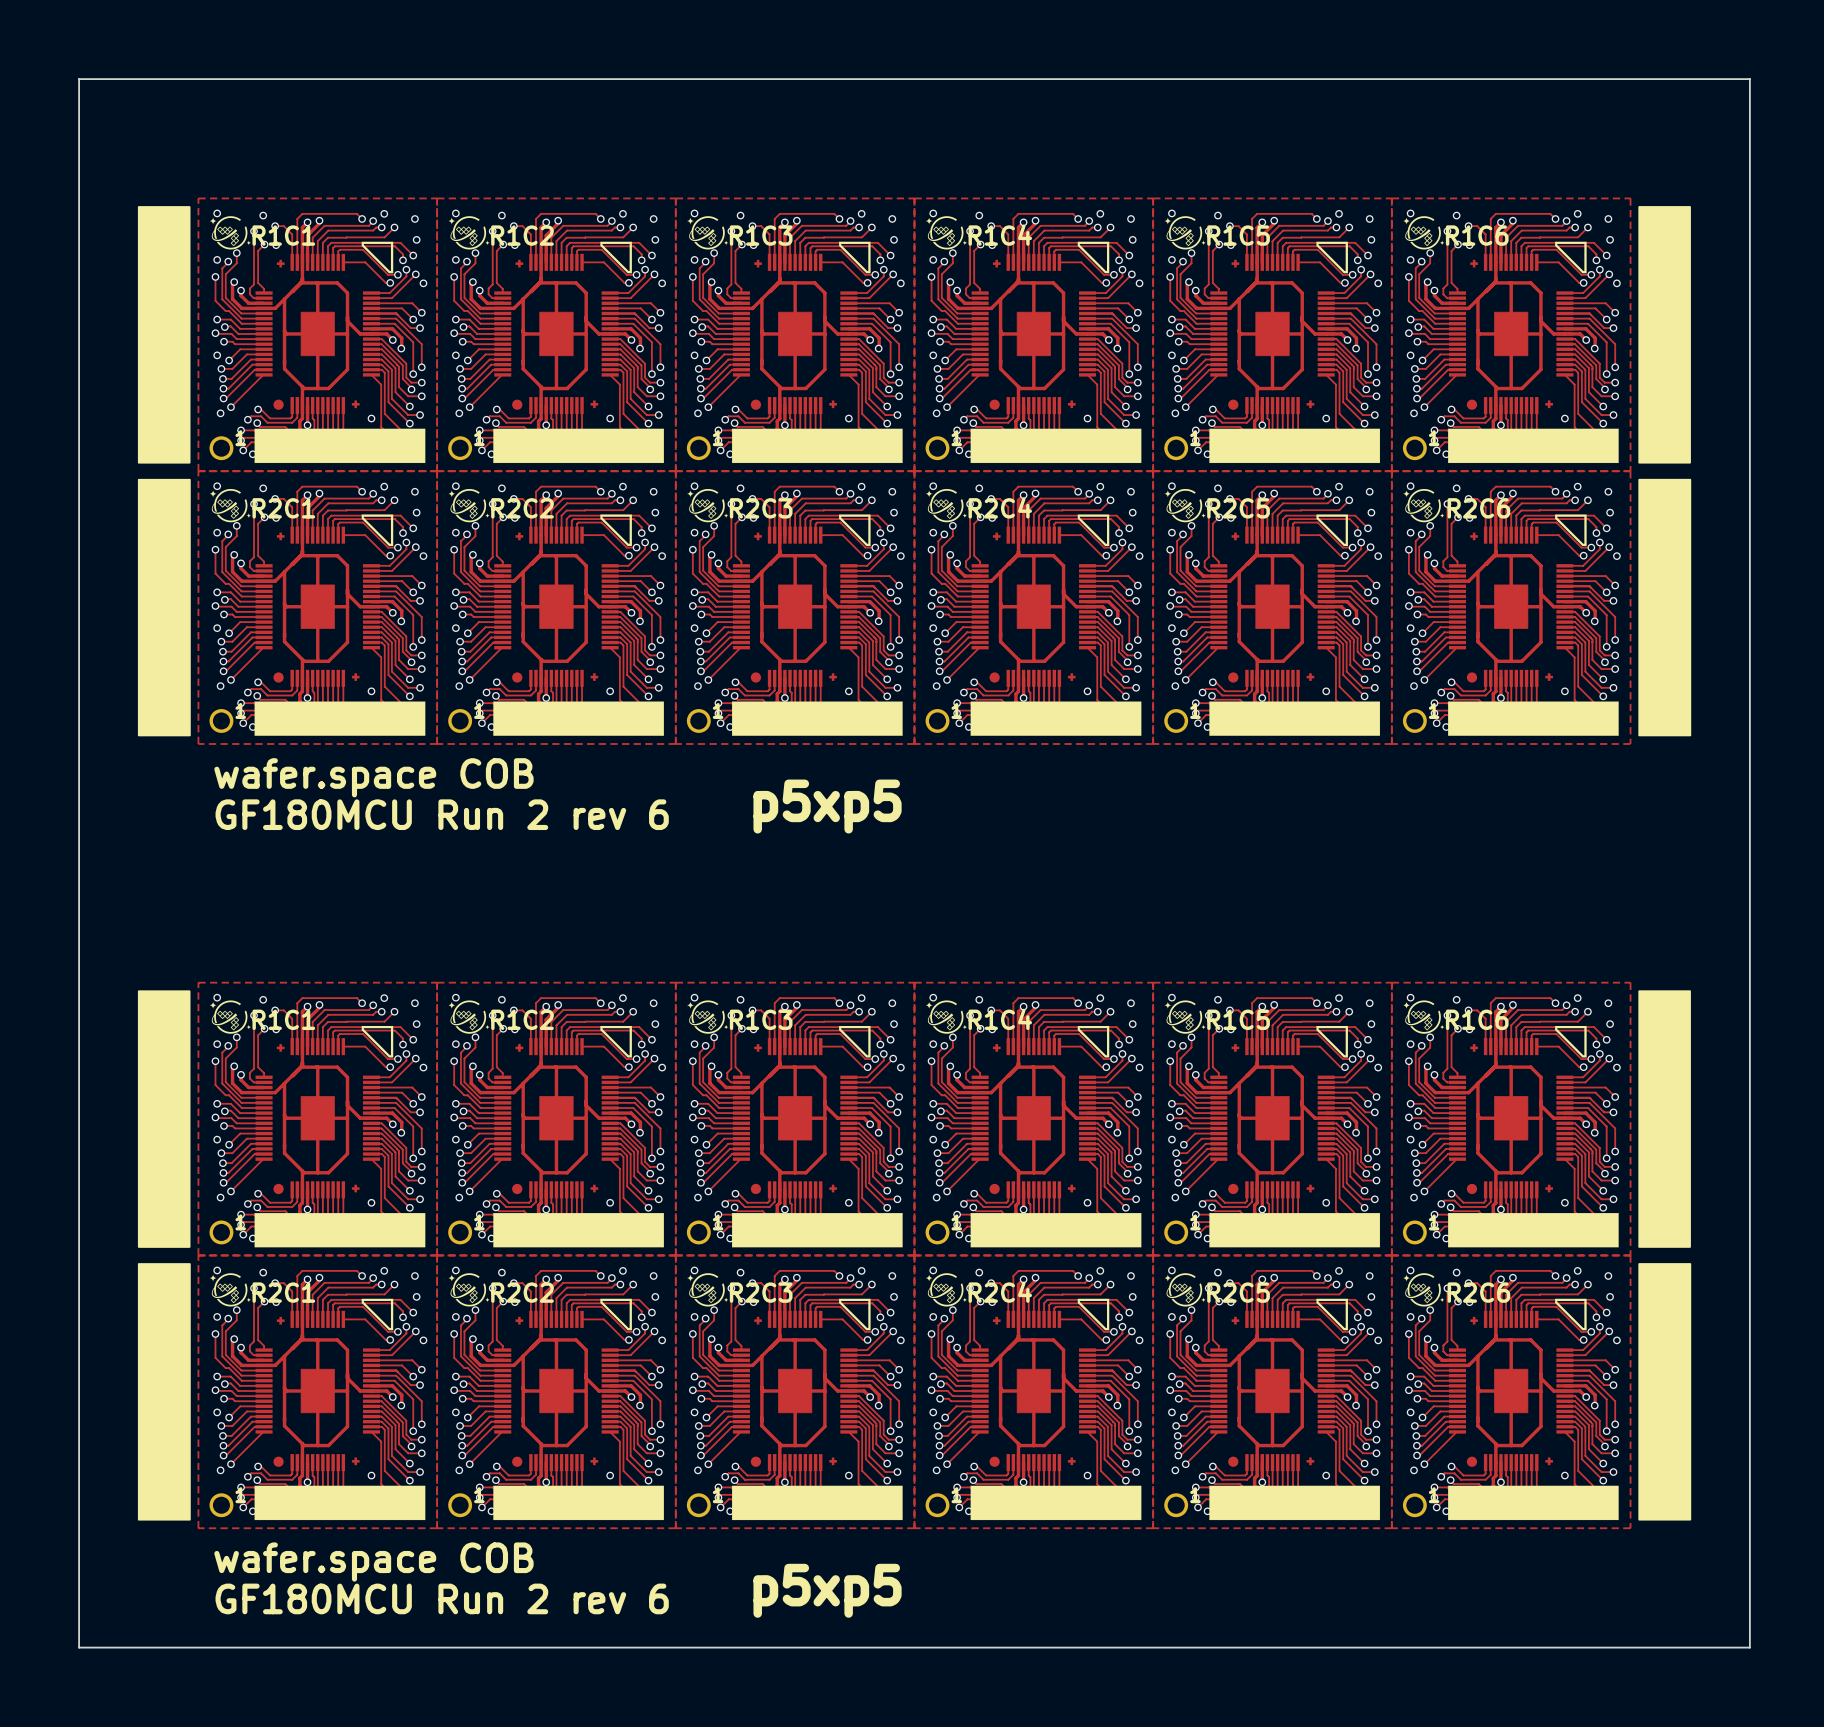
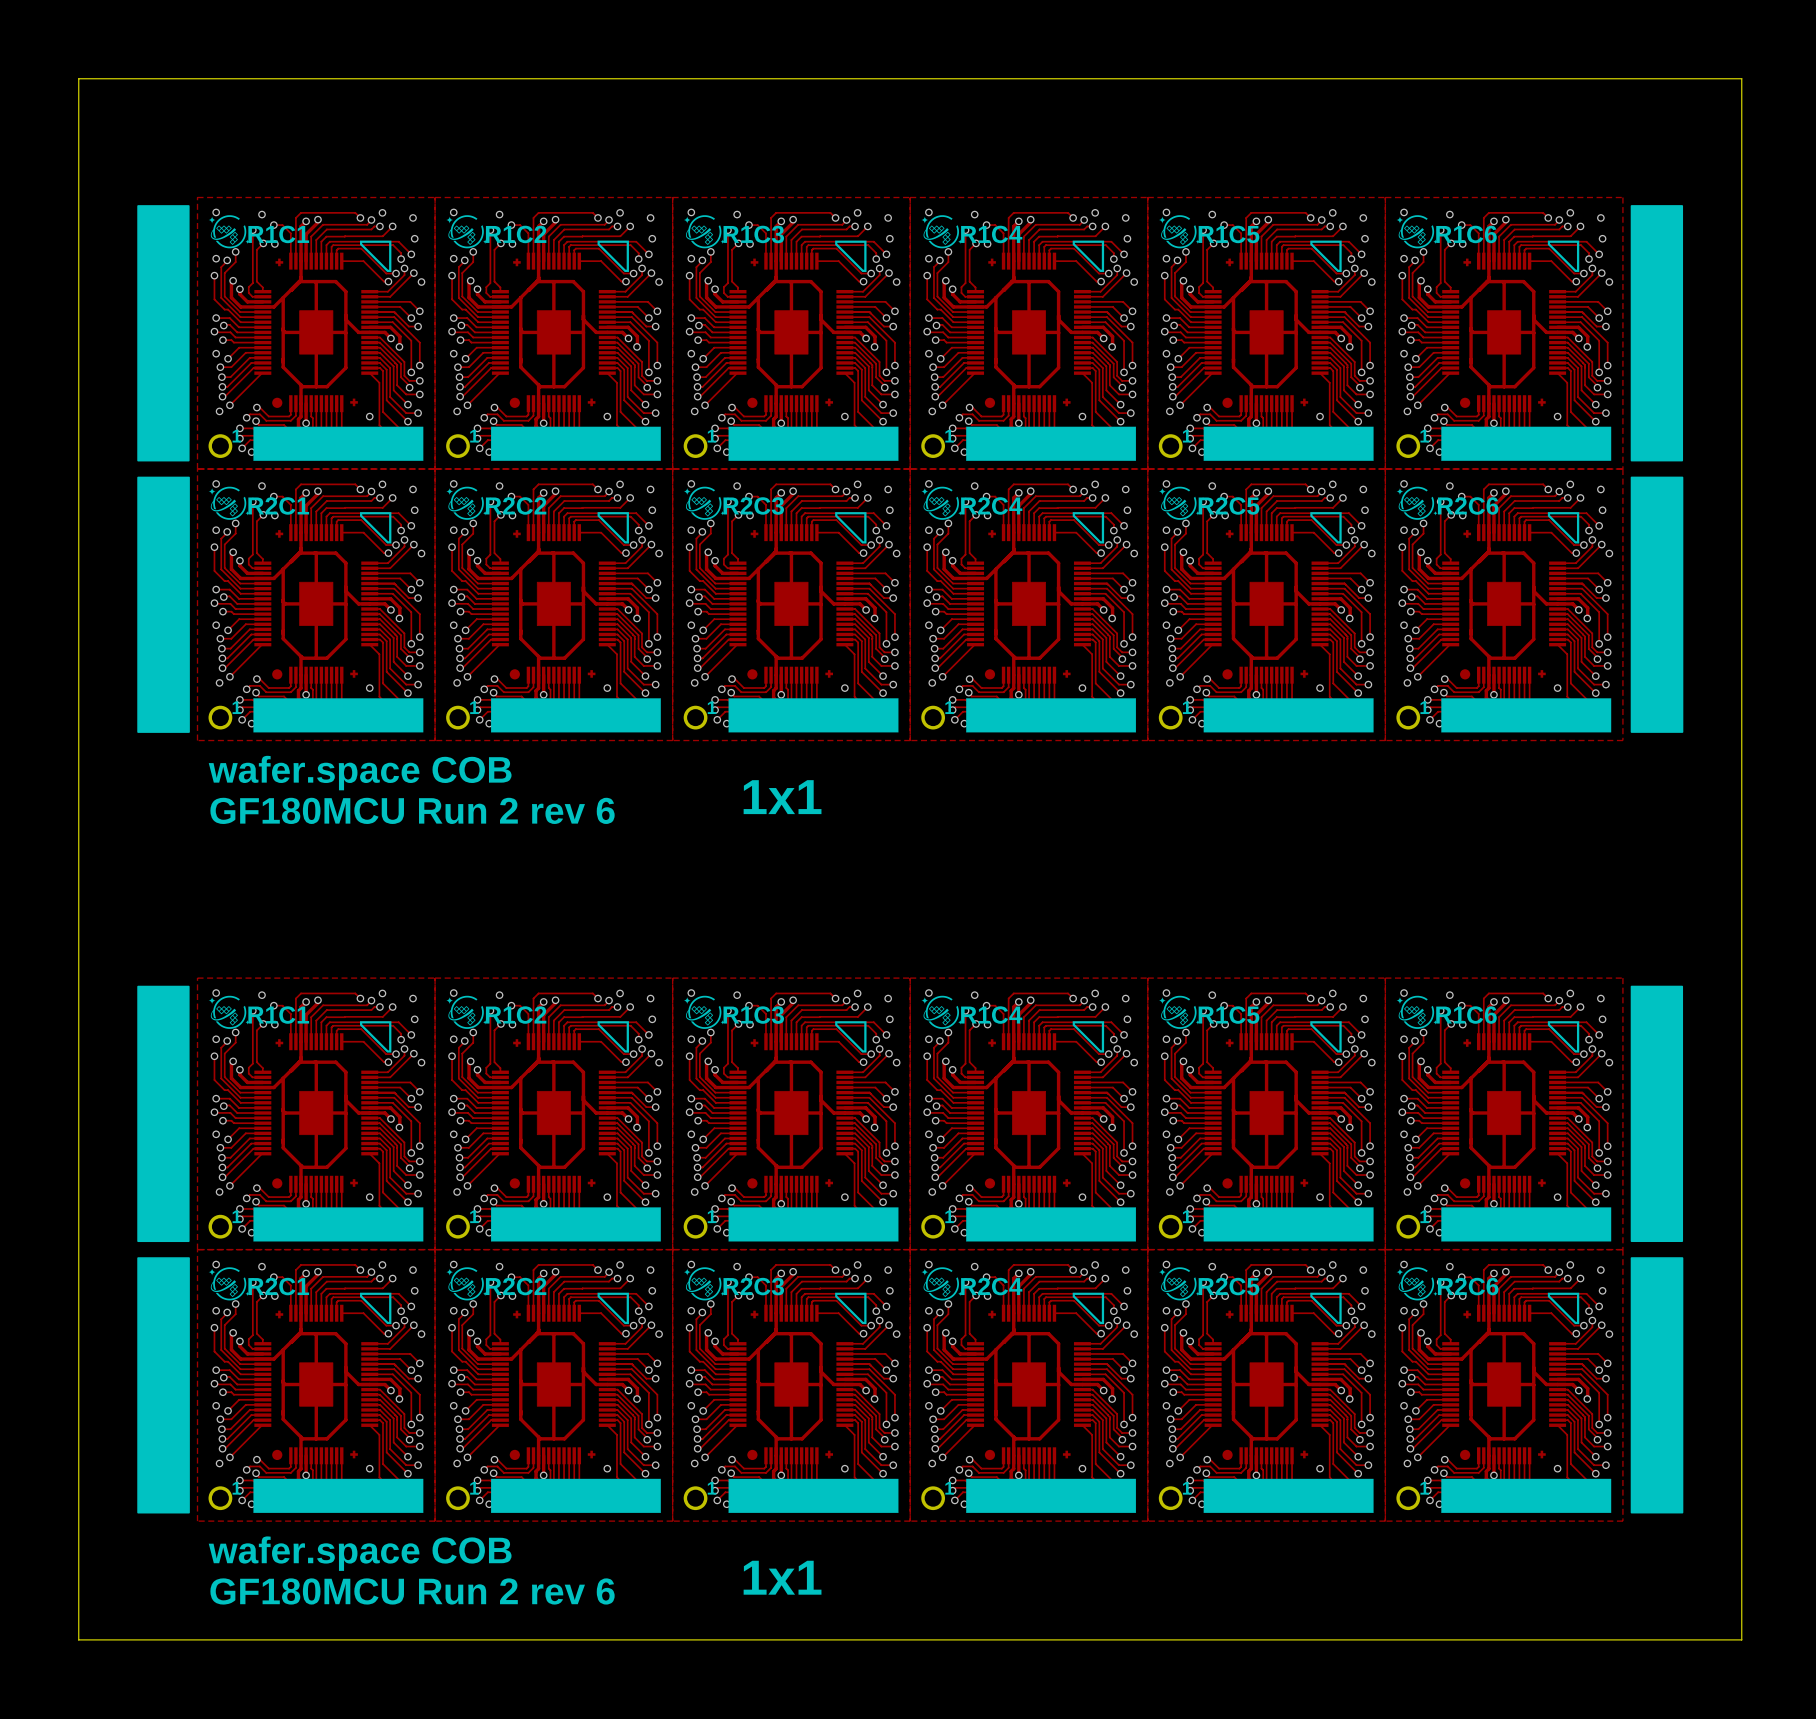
text: p5xp5 (827, 806) -> 1x1 (782, 797)
text: p5xp5 (827, 1590) -> 1x1 (782, 1577)

